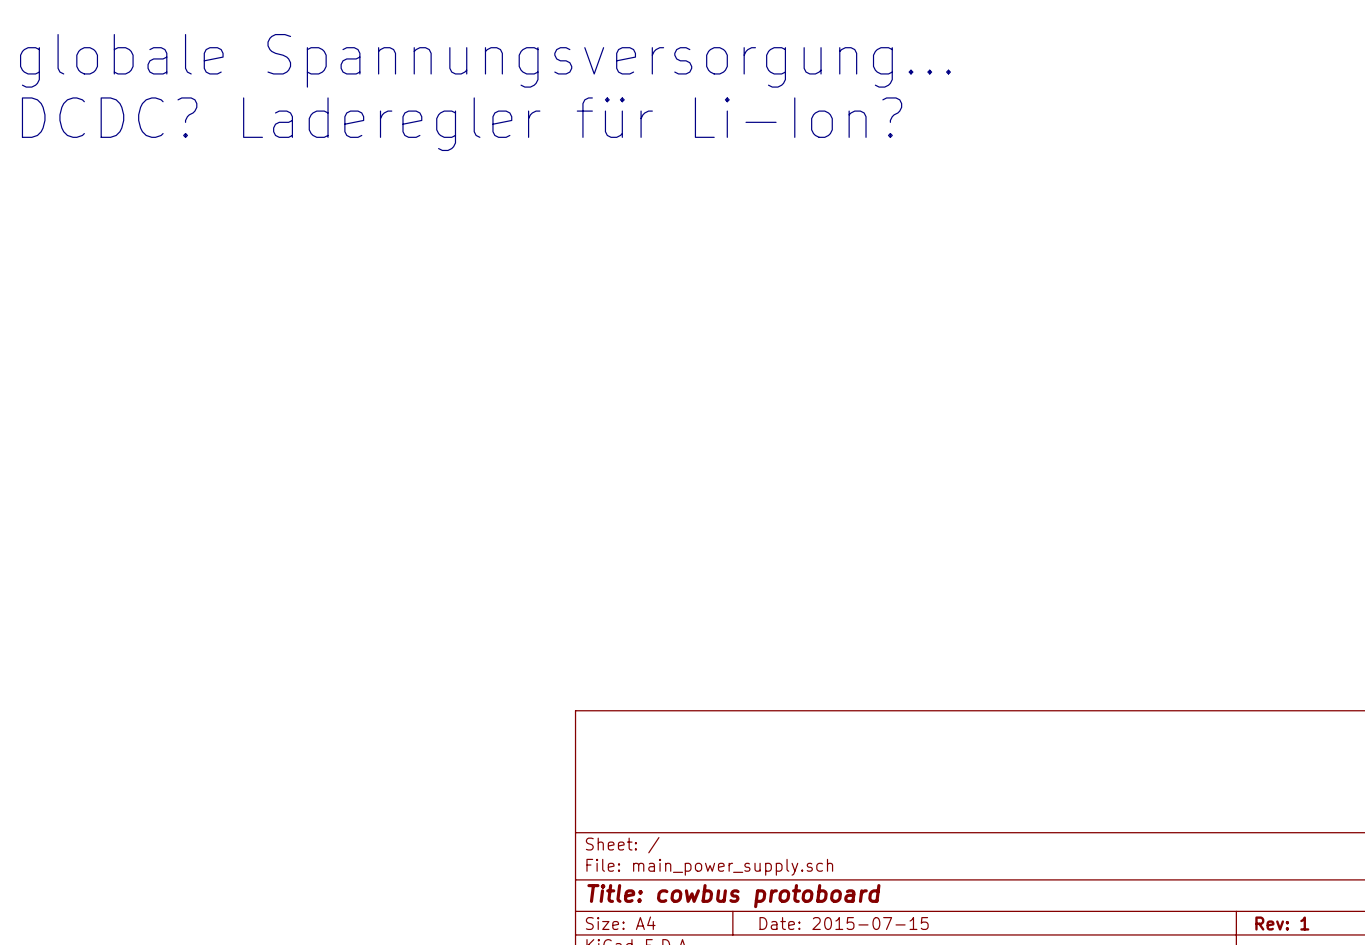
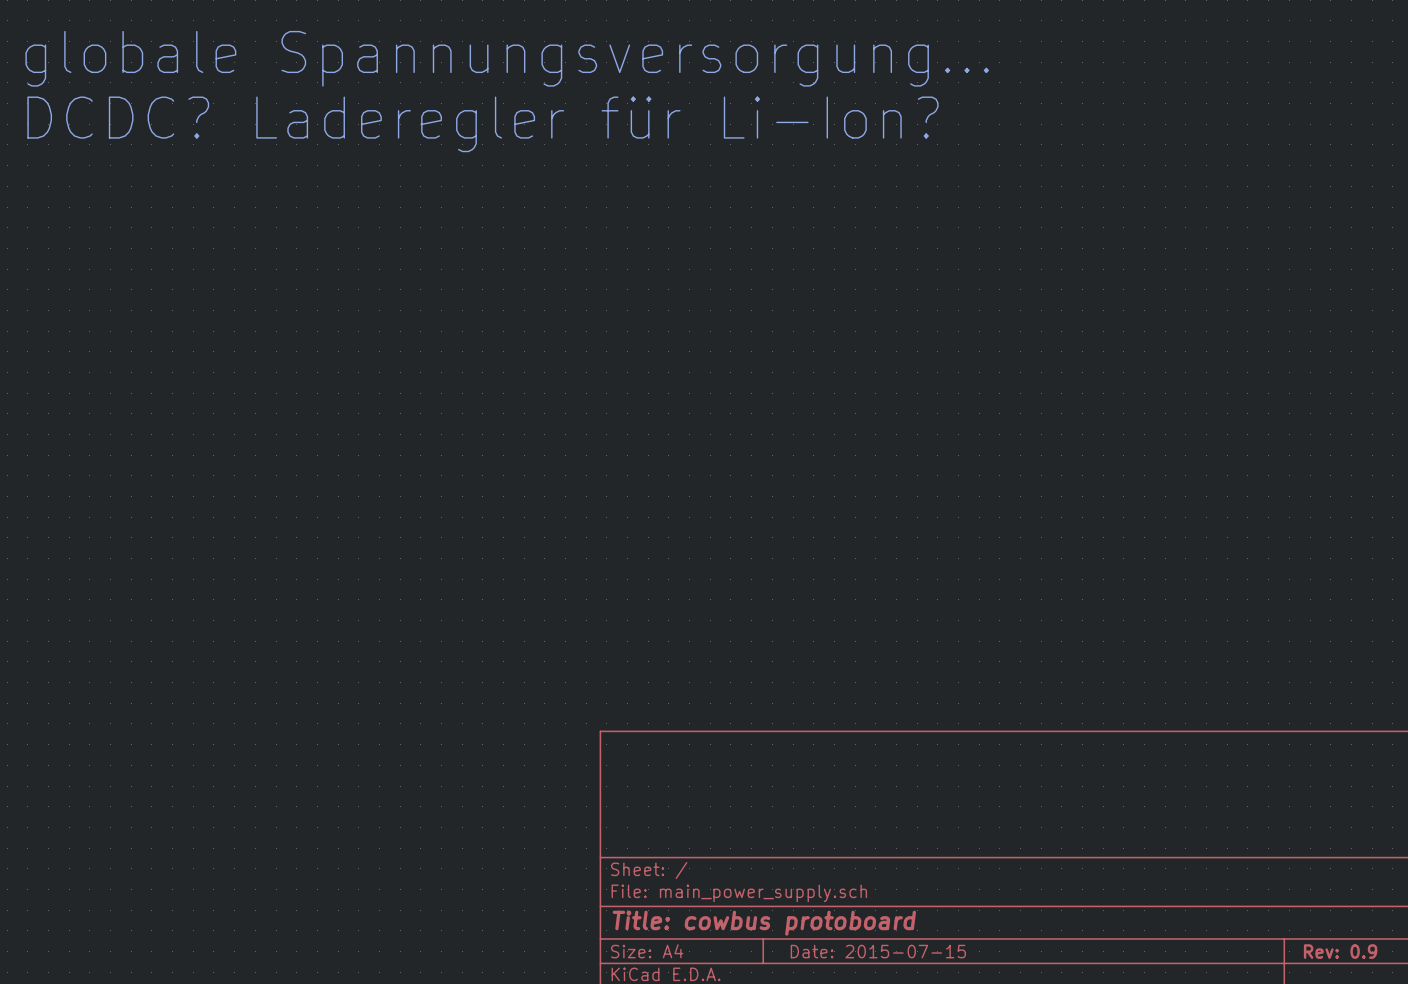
title block: Rev: 1 (1282, 923) -> Rev: 0.9 (1340, 951)

